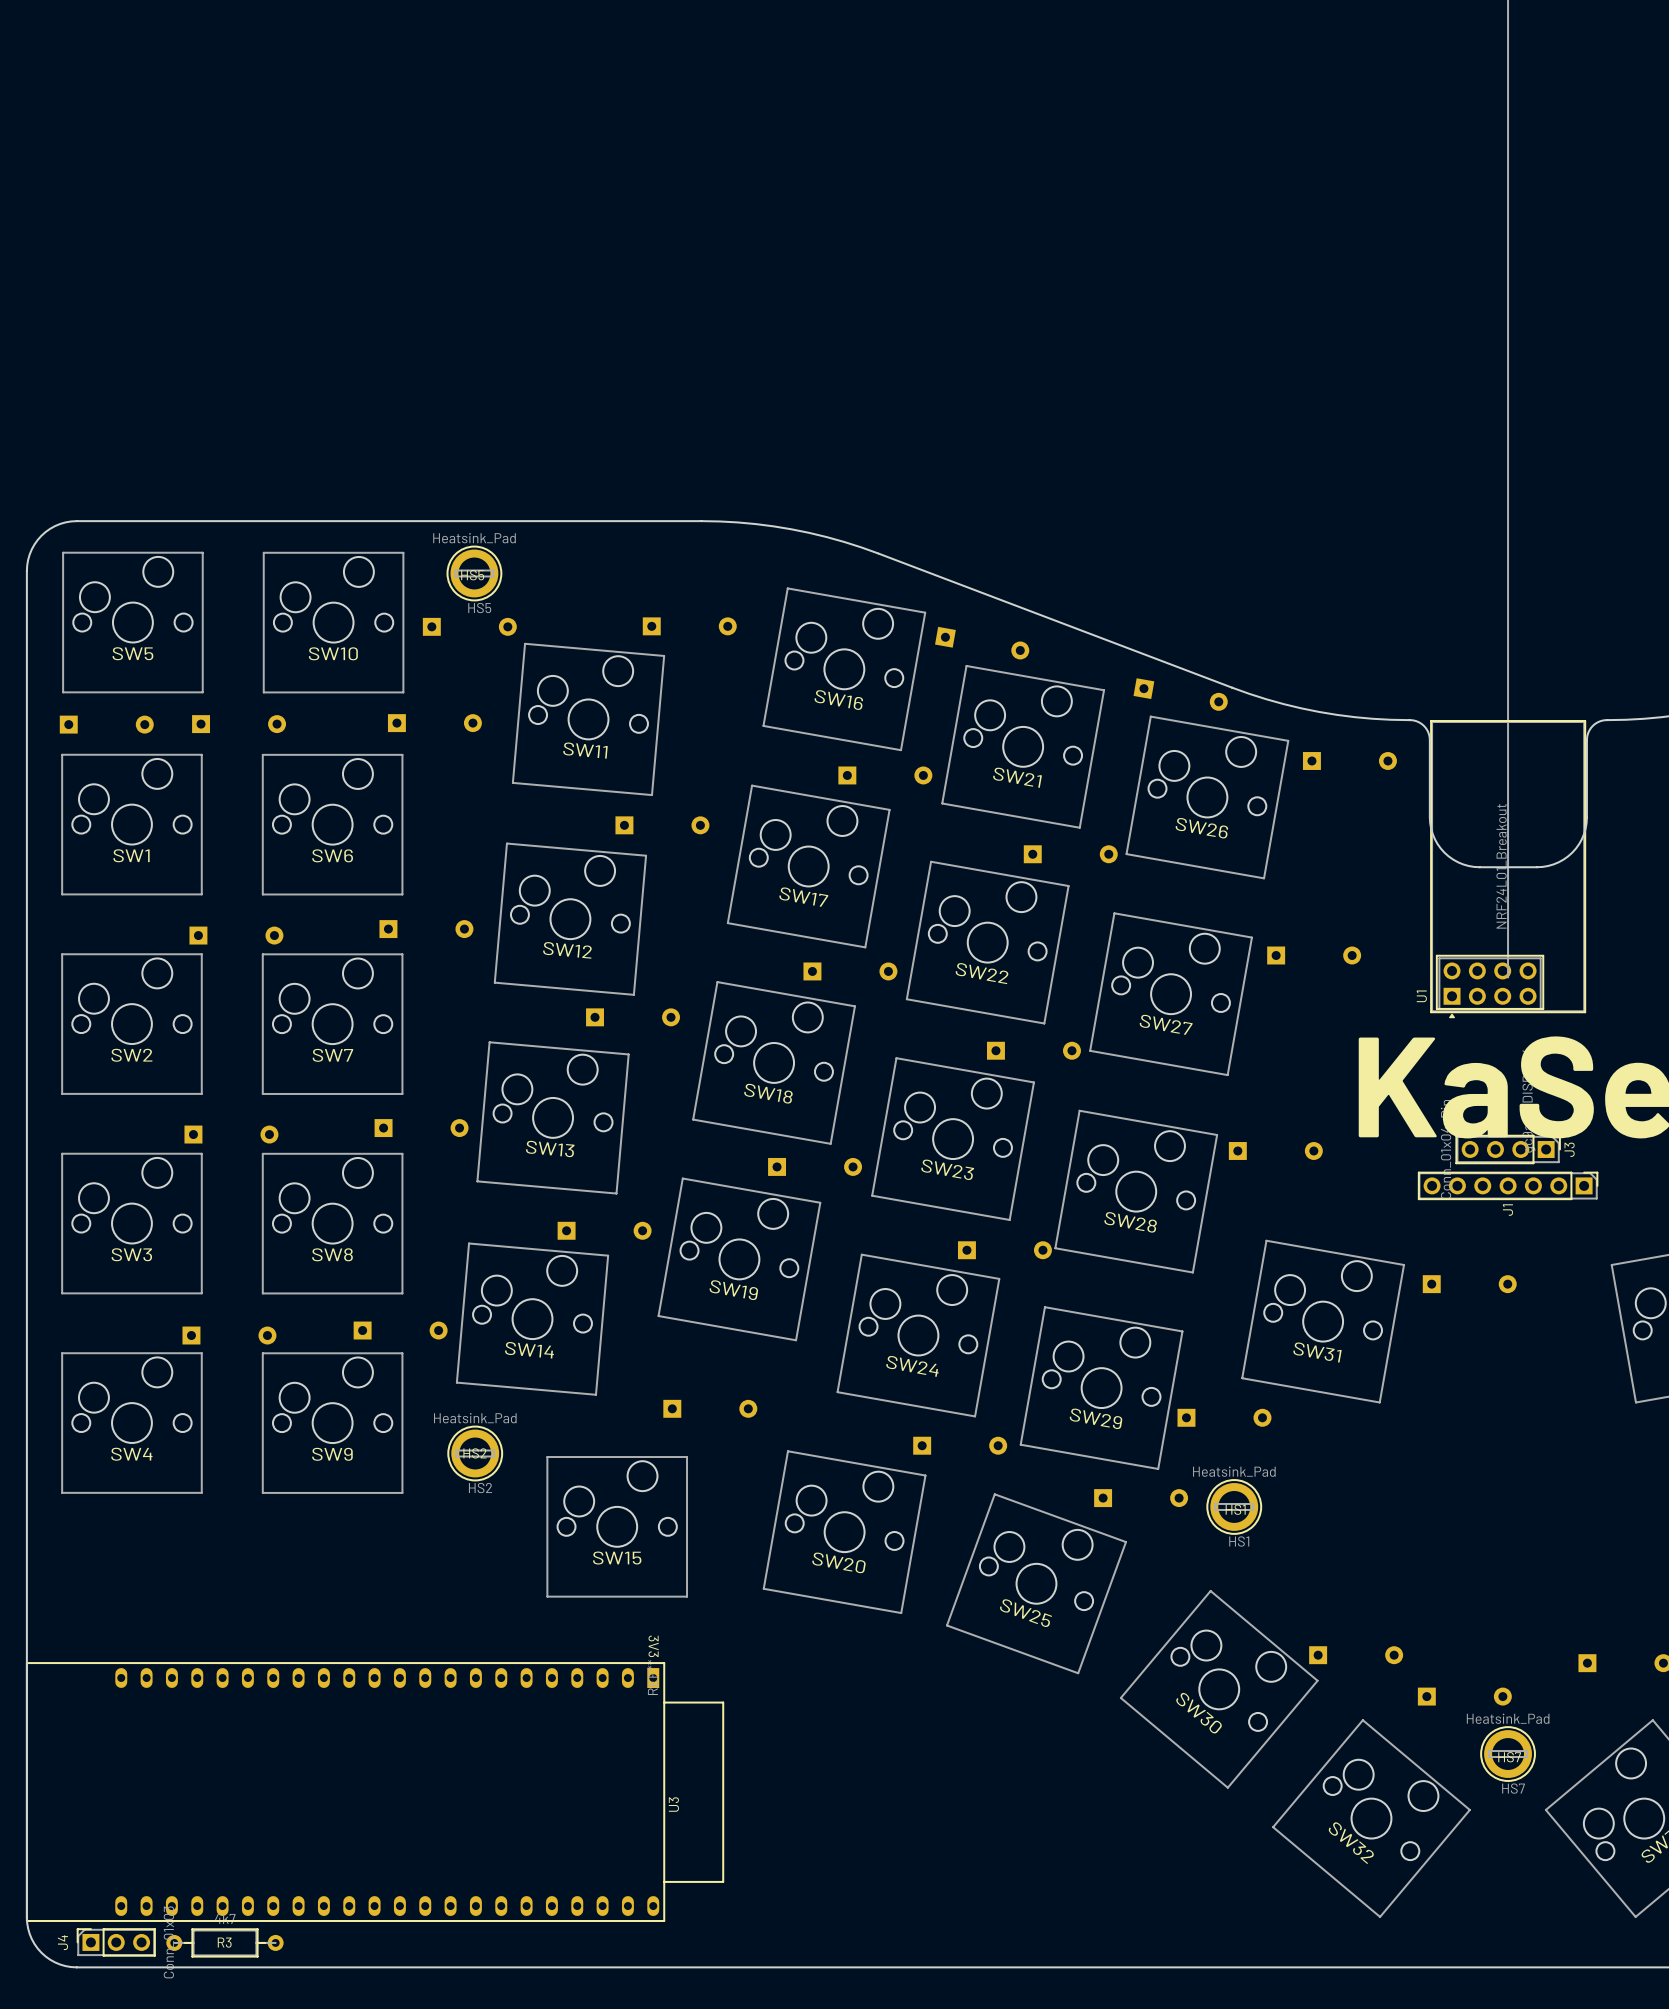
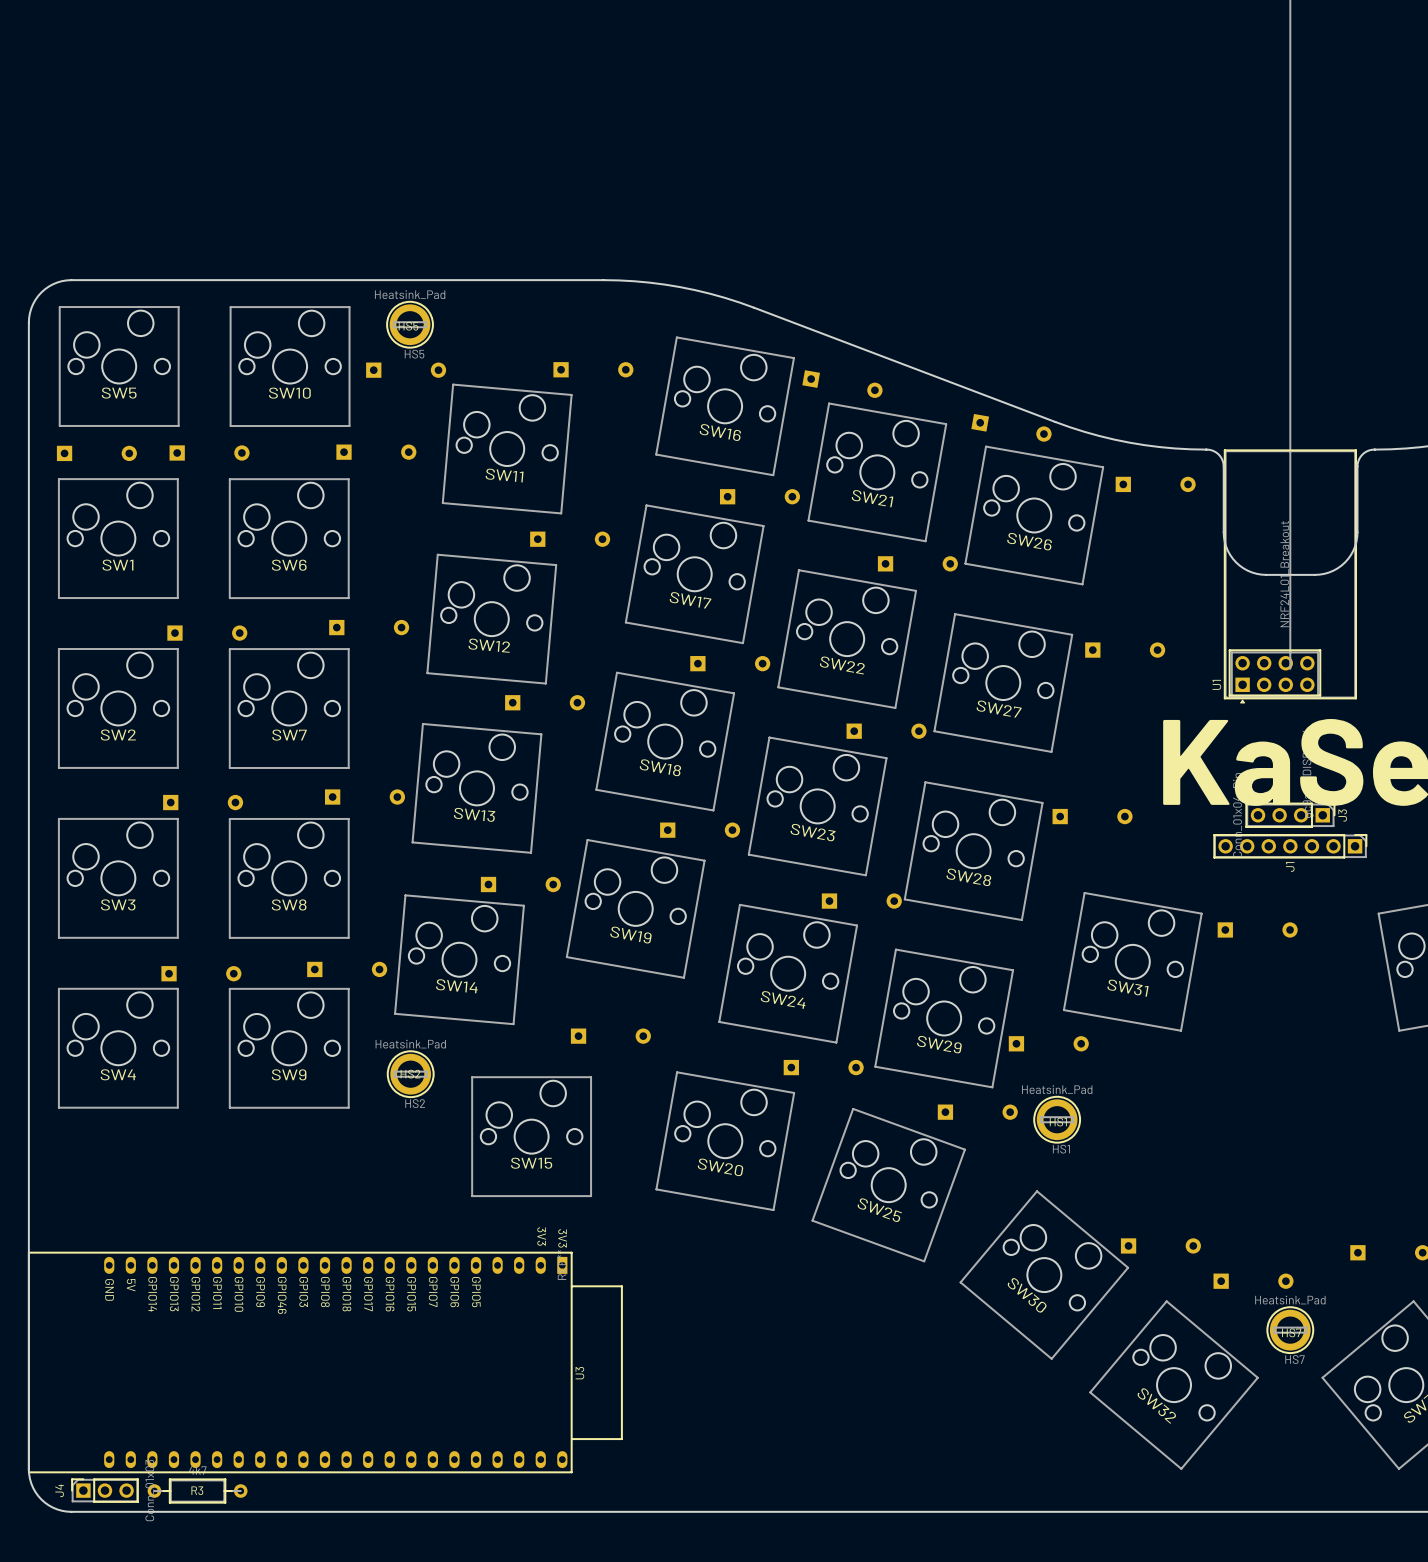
U3 footprint: [26, 1662, 724, 1922] -> [28, 1252, 623, 1473]

